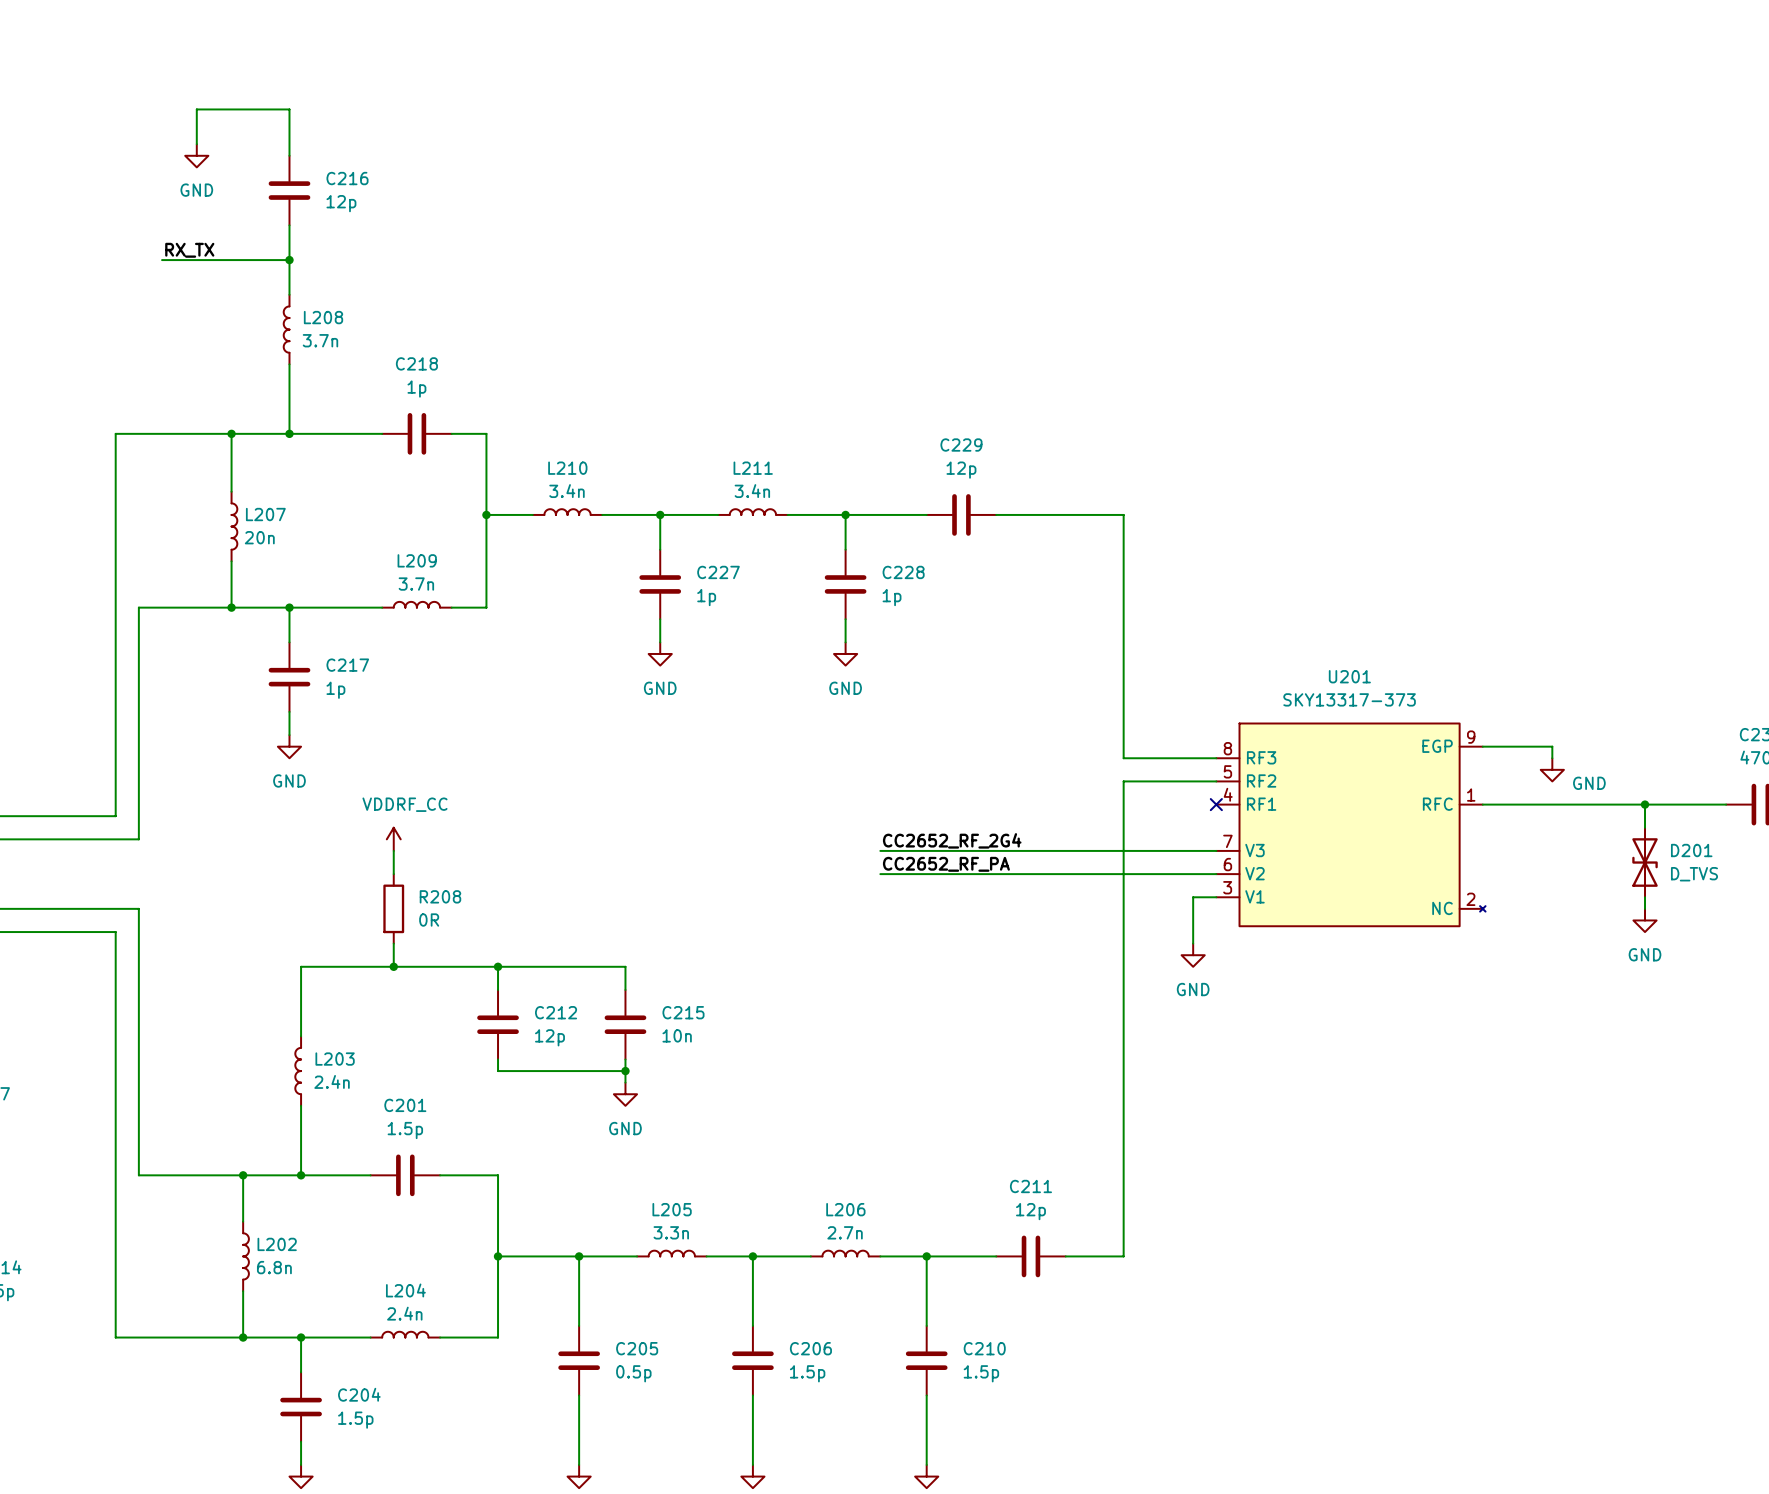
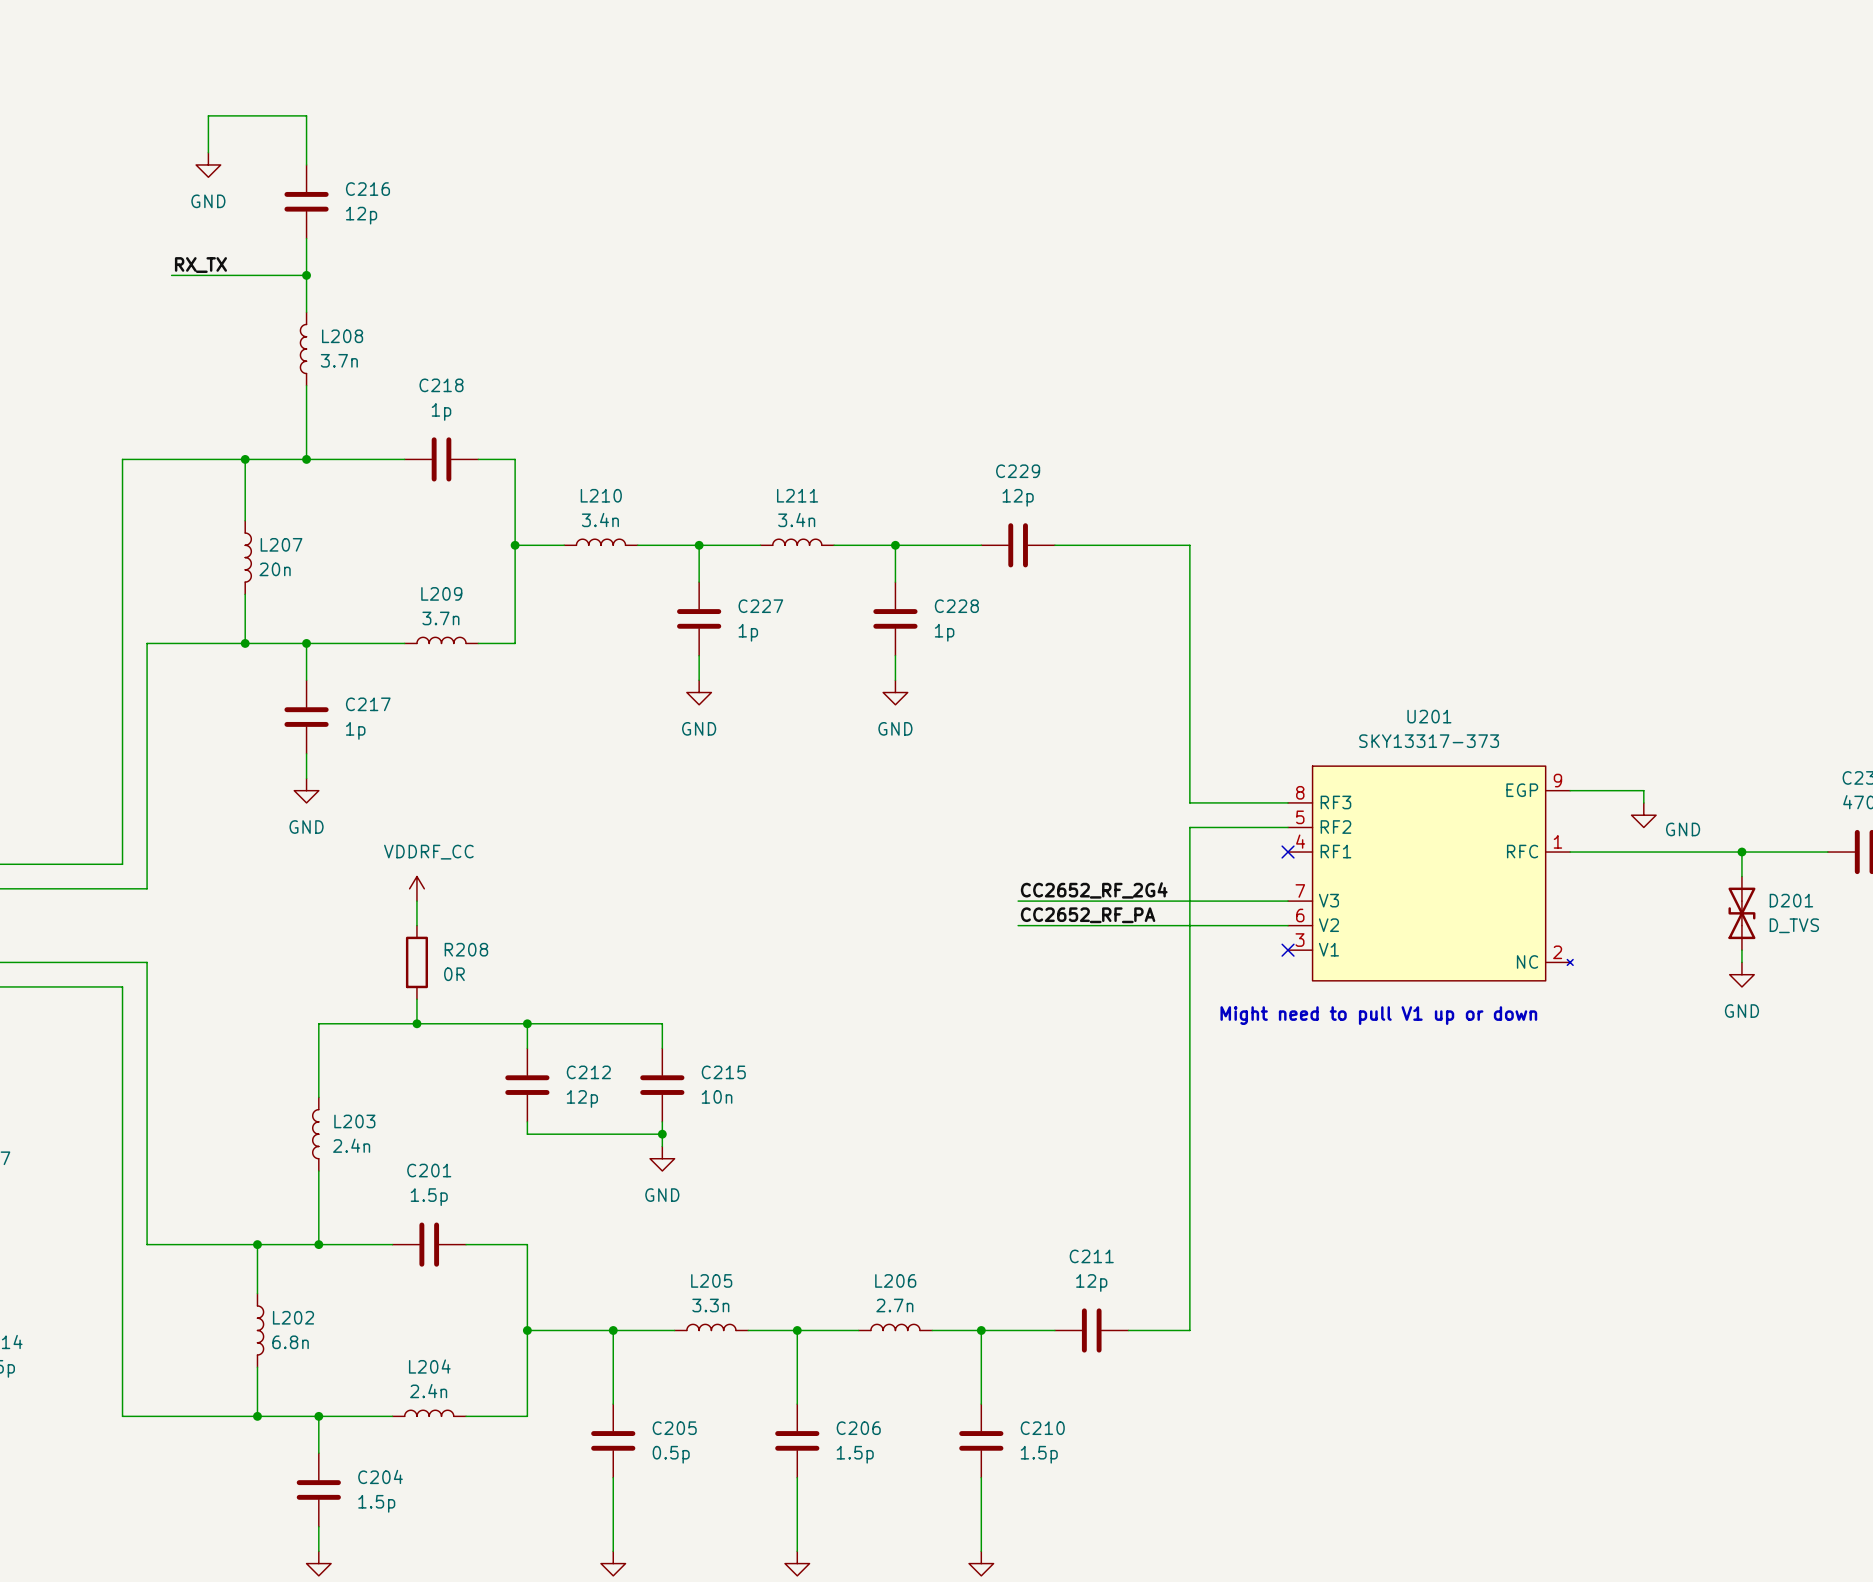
label position: CC2652_RF_2G4 (952, 840) -> CC2652_RF_2G4 (1094, 890)
wire: (880, 850) (961, 850) -> none
label position: CC2652_RF_PA (946, 864) -> CC2652_RF_PA (1088, 915)
wire: (880, 874) (961, 874) -> none
wire: (1216, 897) (1193, 897) (1193, 943) -> none
no-connect mark: none -> (1288, 950)
power symbol: GND (1193, 955) -> none
text: none -> Might need to pull V1 up or down (1378, 1015)

